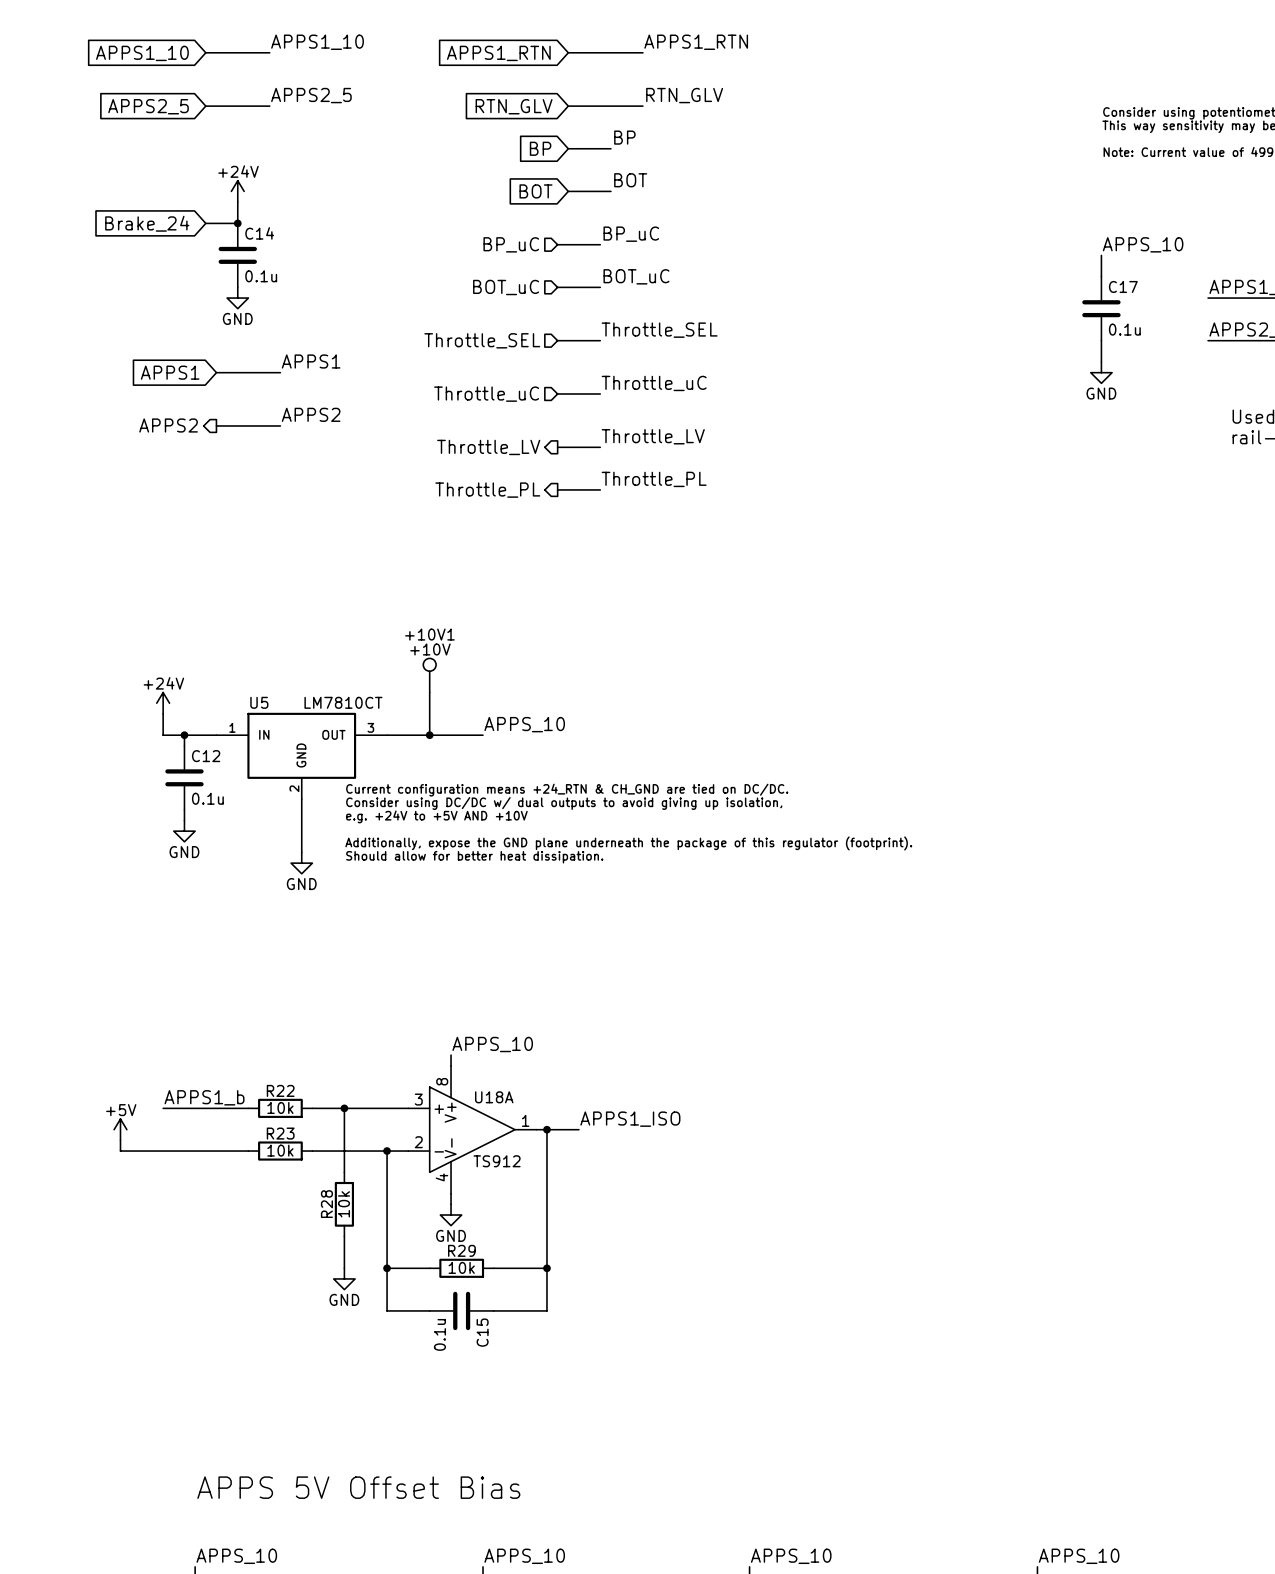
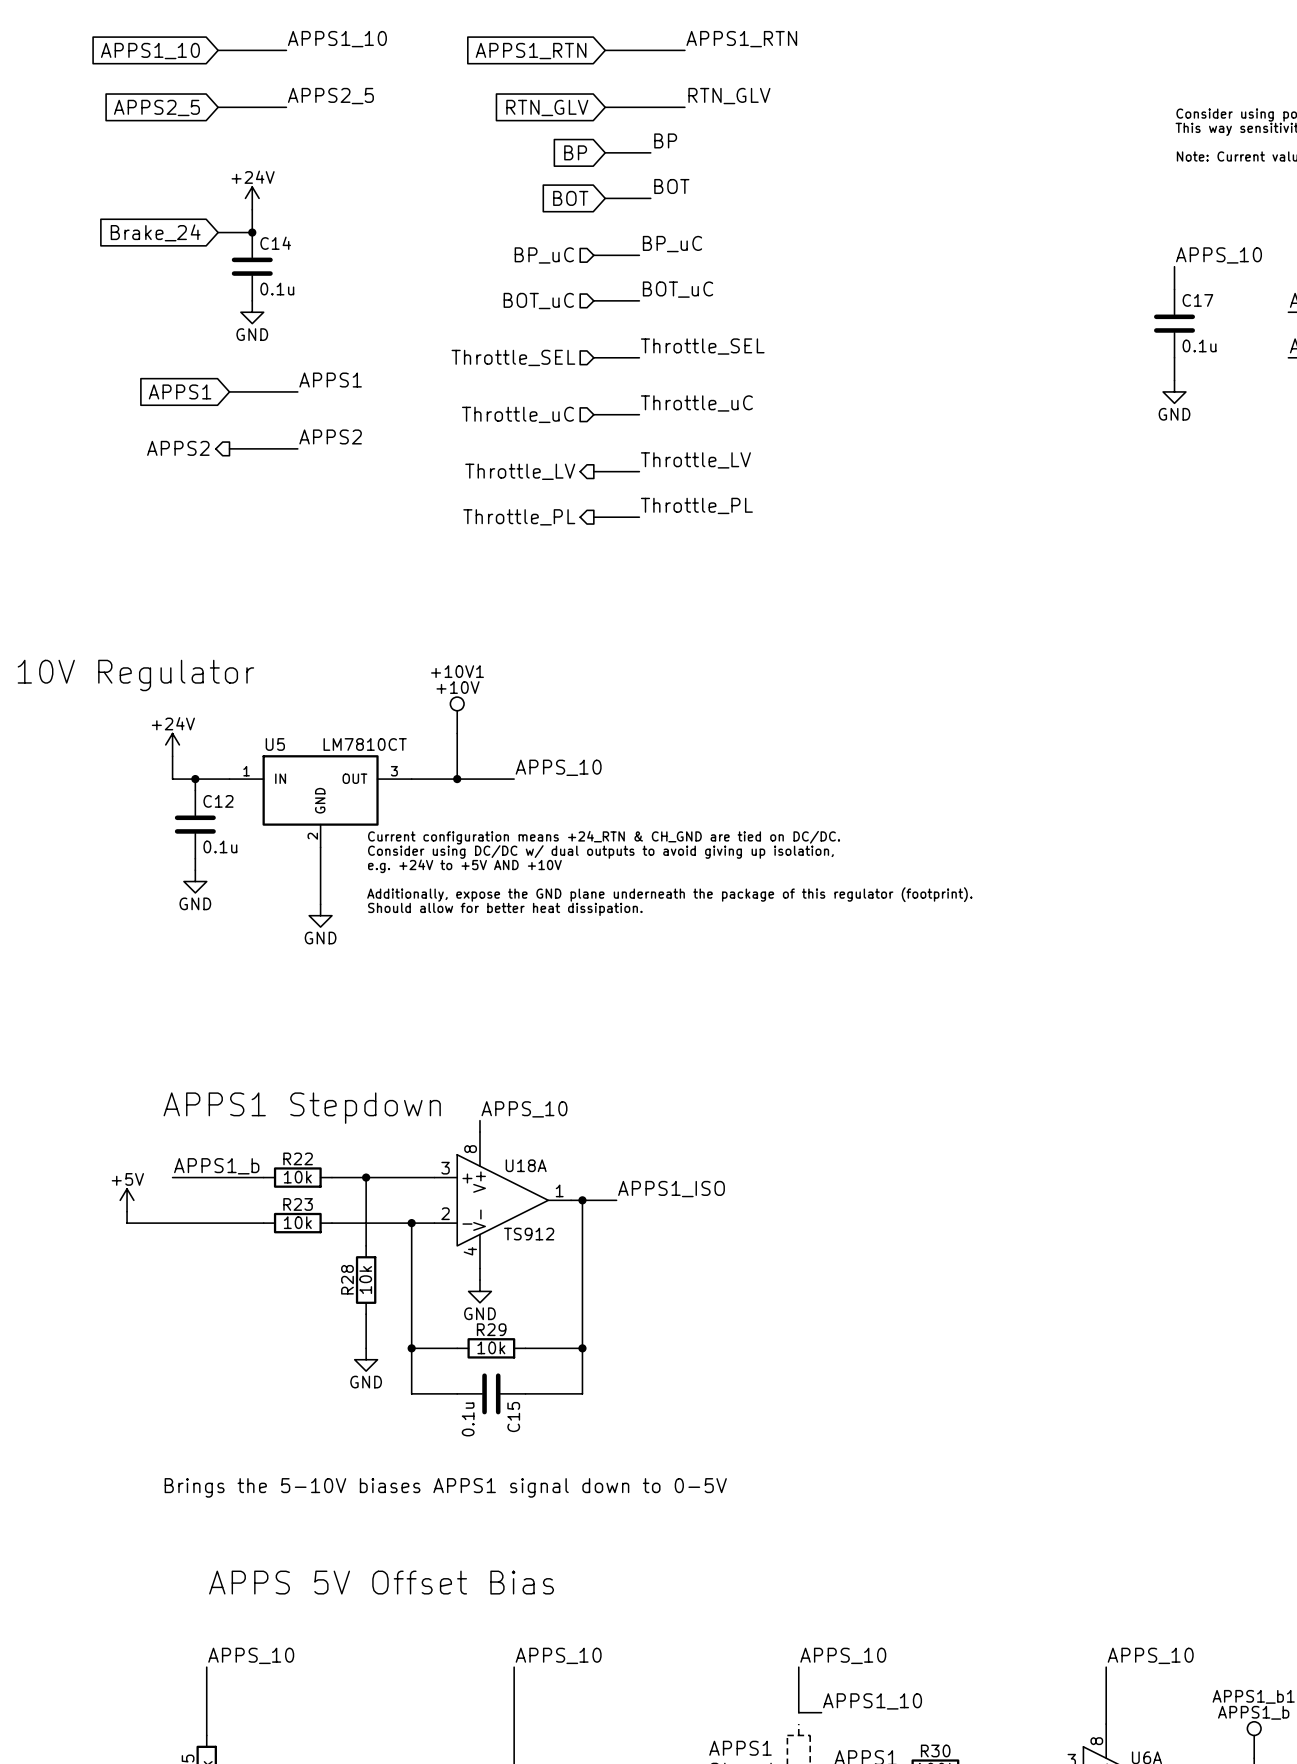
text: none -> 10V Regulator (135, 675)
text: none -> APPS1 Stepdown (302, 1108)
text: none -> Brings the 5-10V biases APPS1 signal down to 0-5V (445, 1487)

